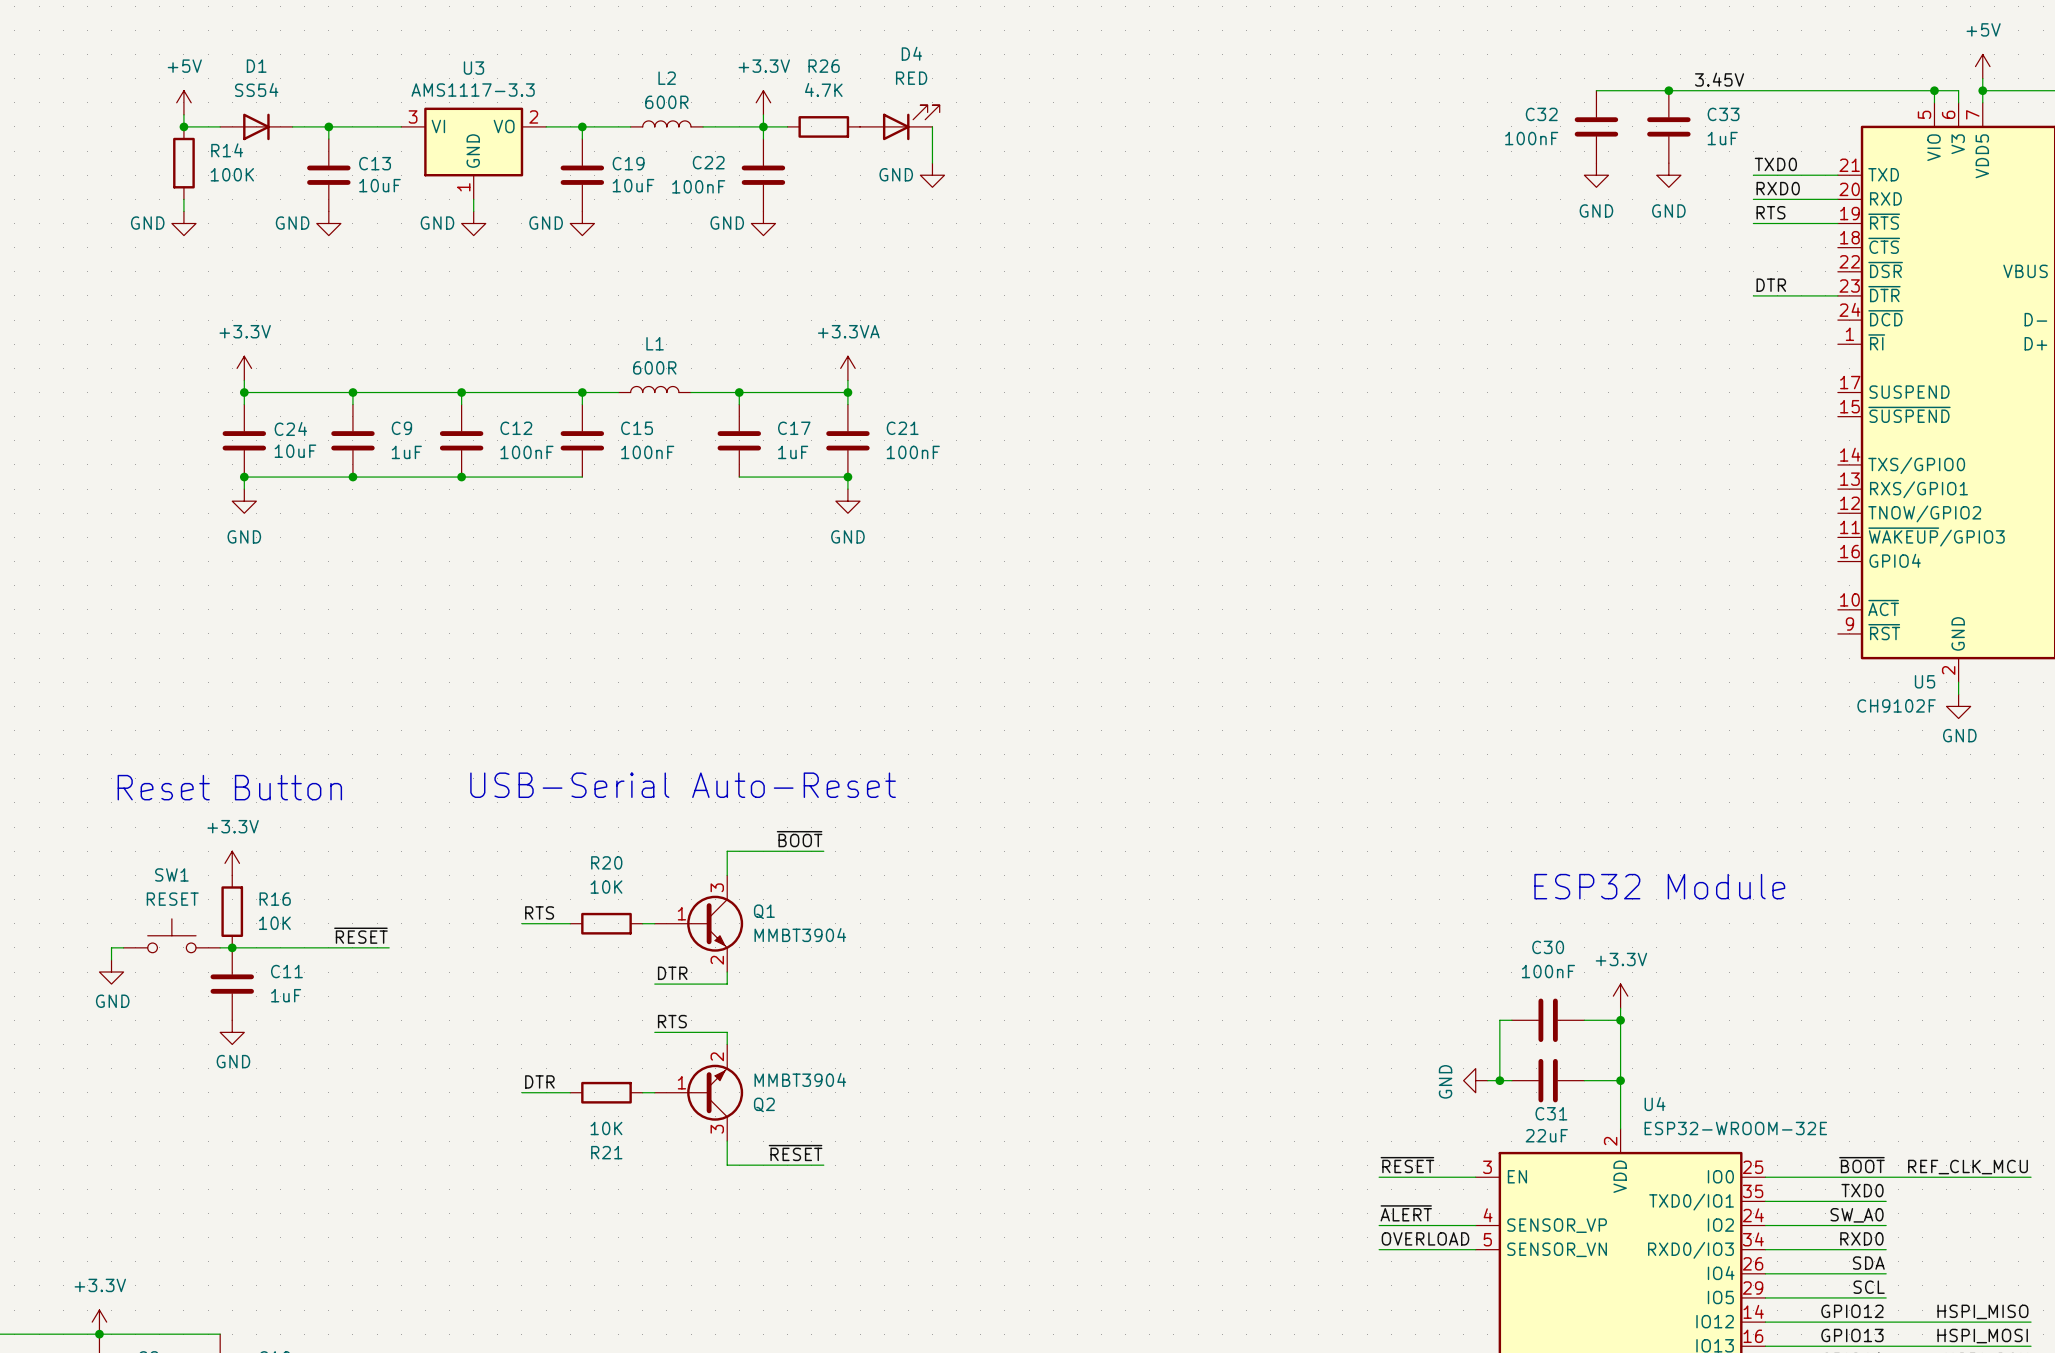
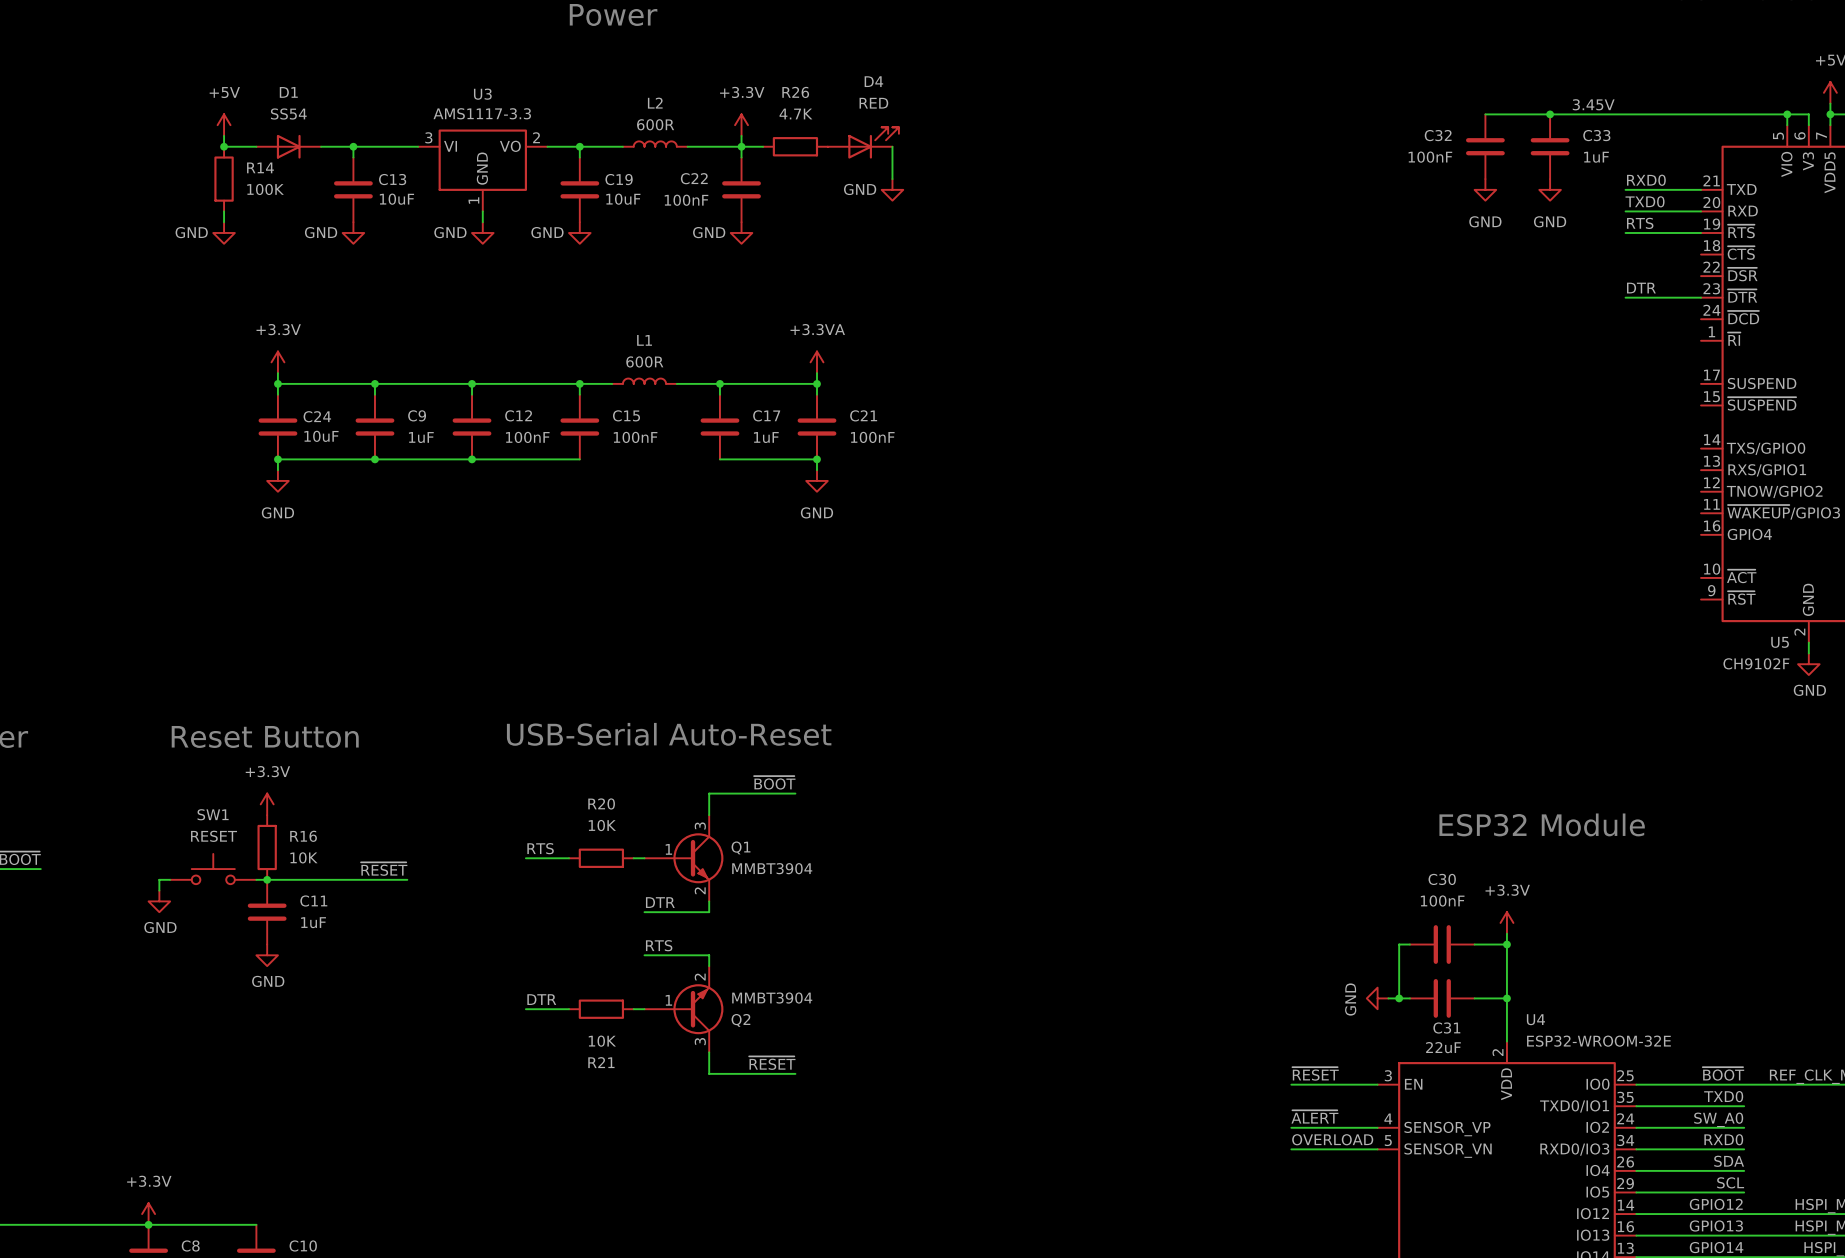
label: TXD0 (1775, 164) -> RXD0 (1646, 180)
label: RXD0 (1778, 188) -> TXD0 (1645, 201)

